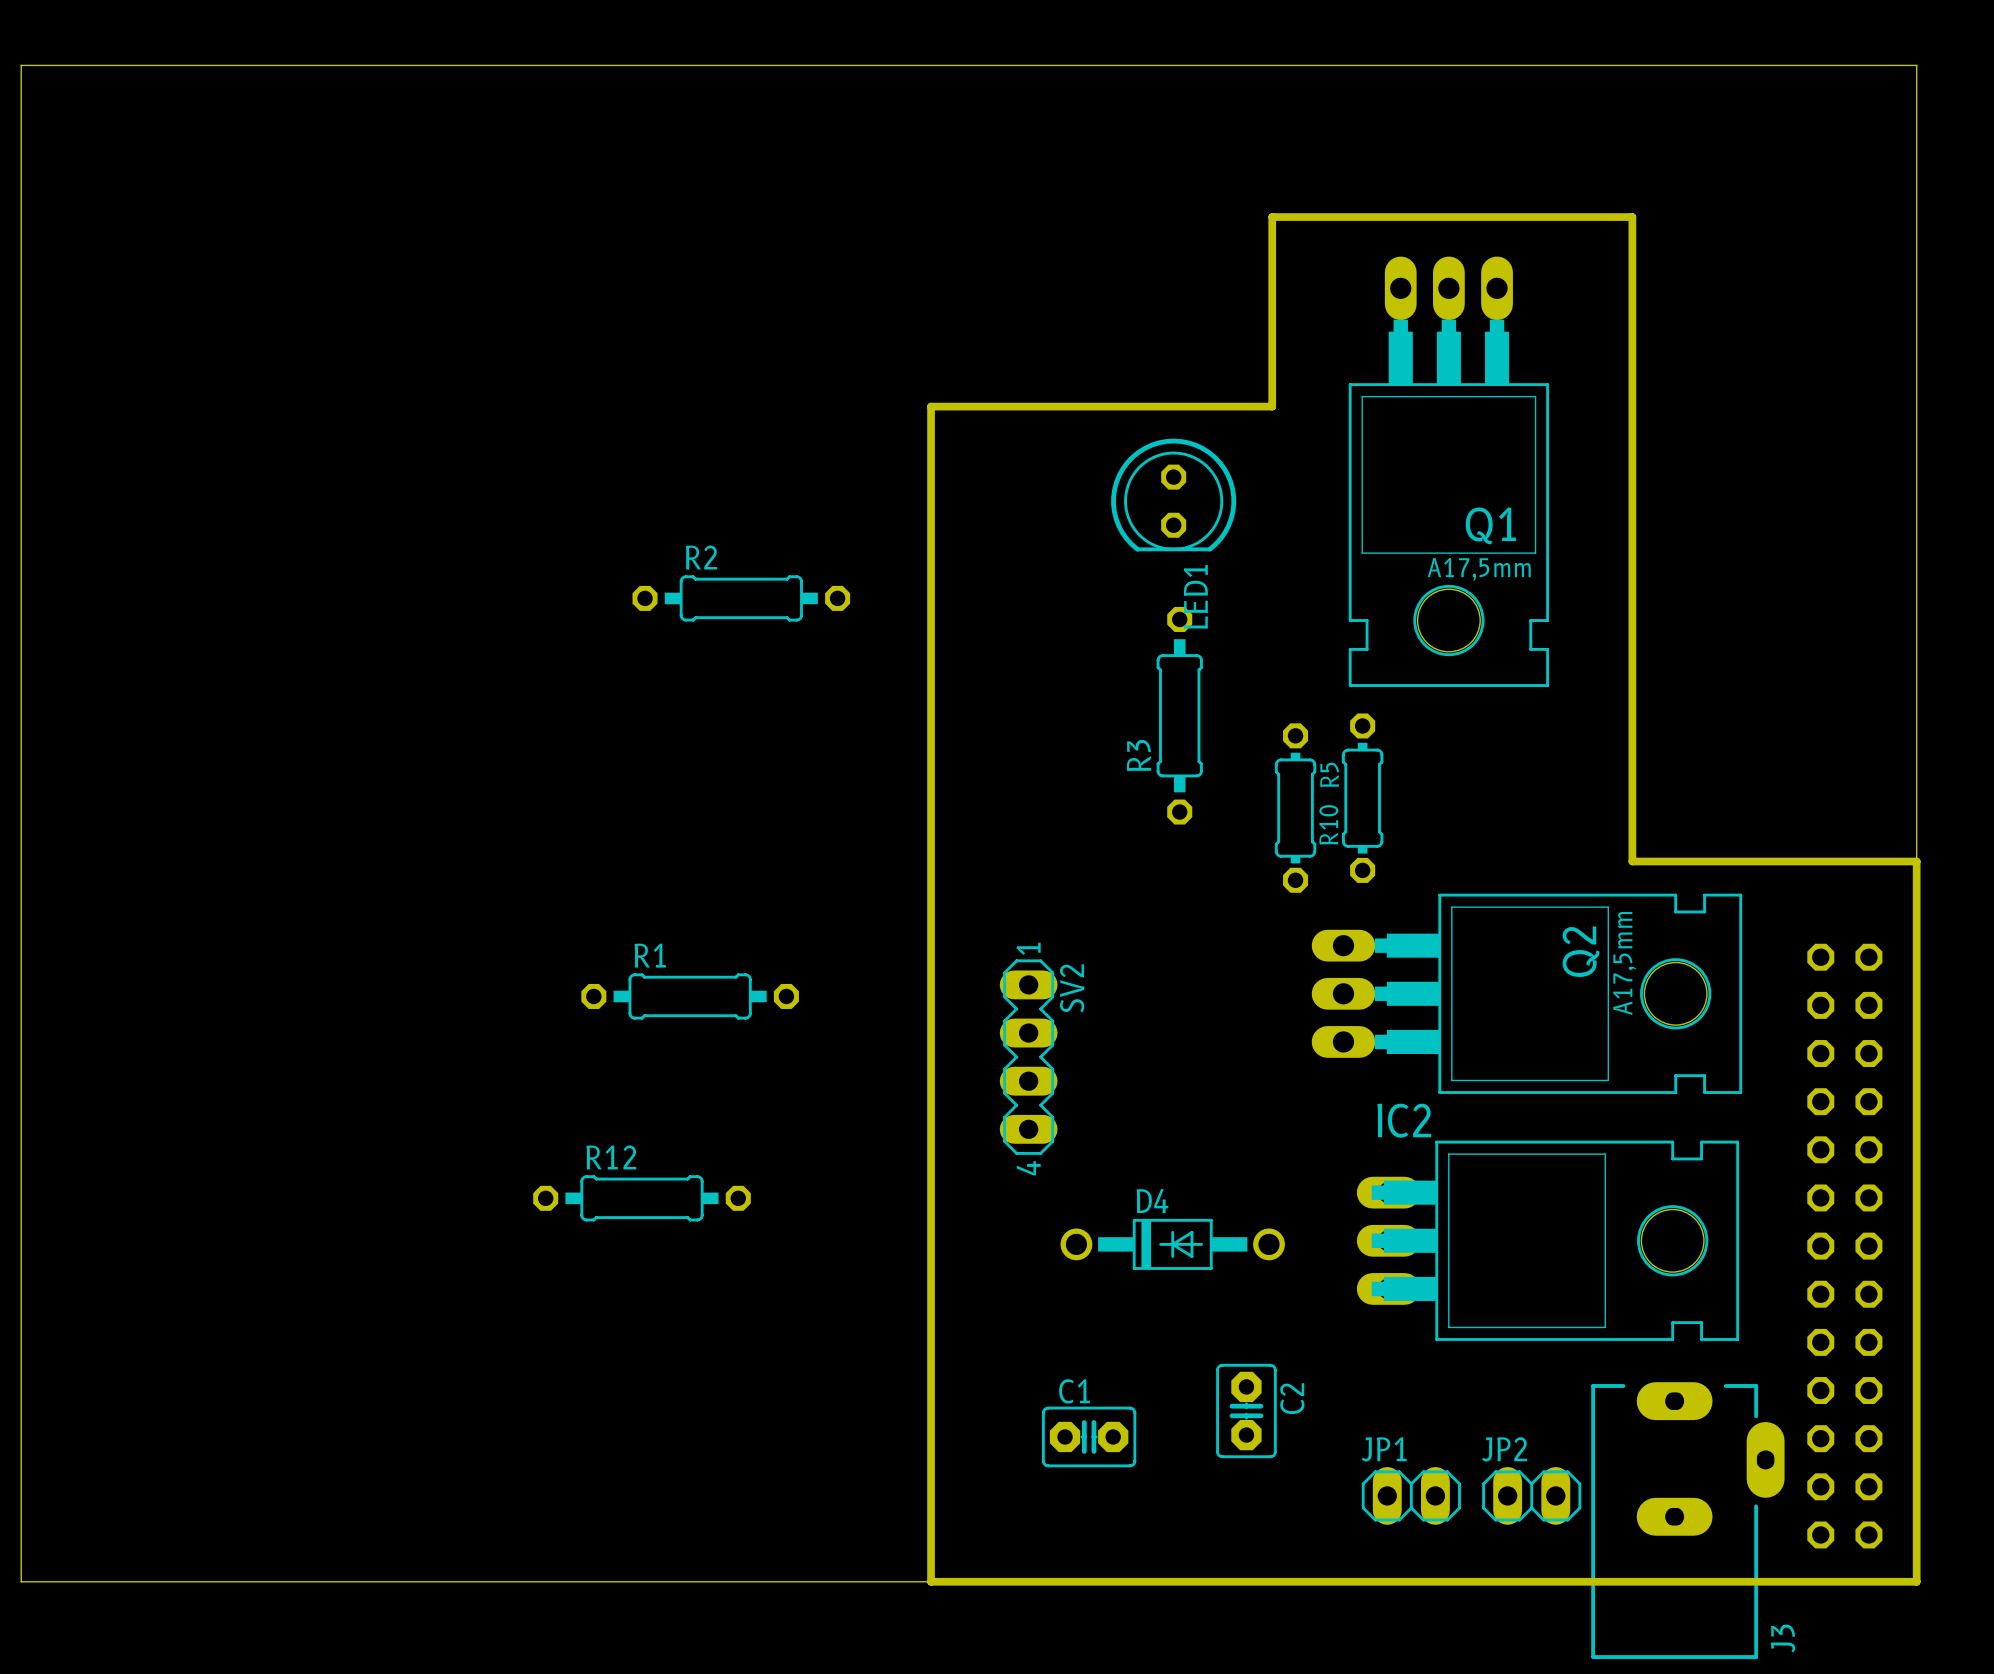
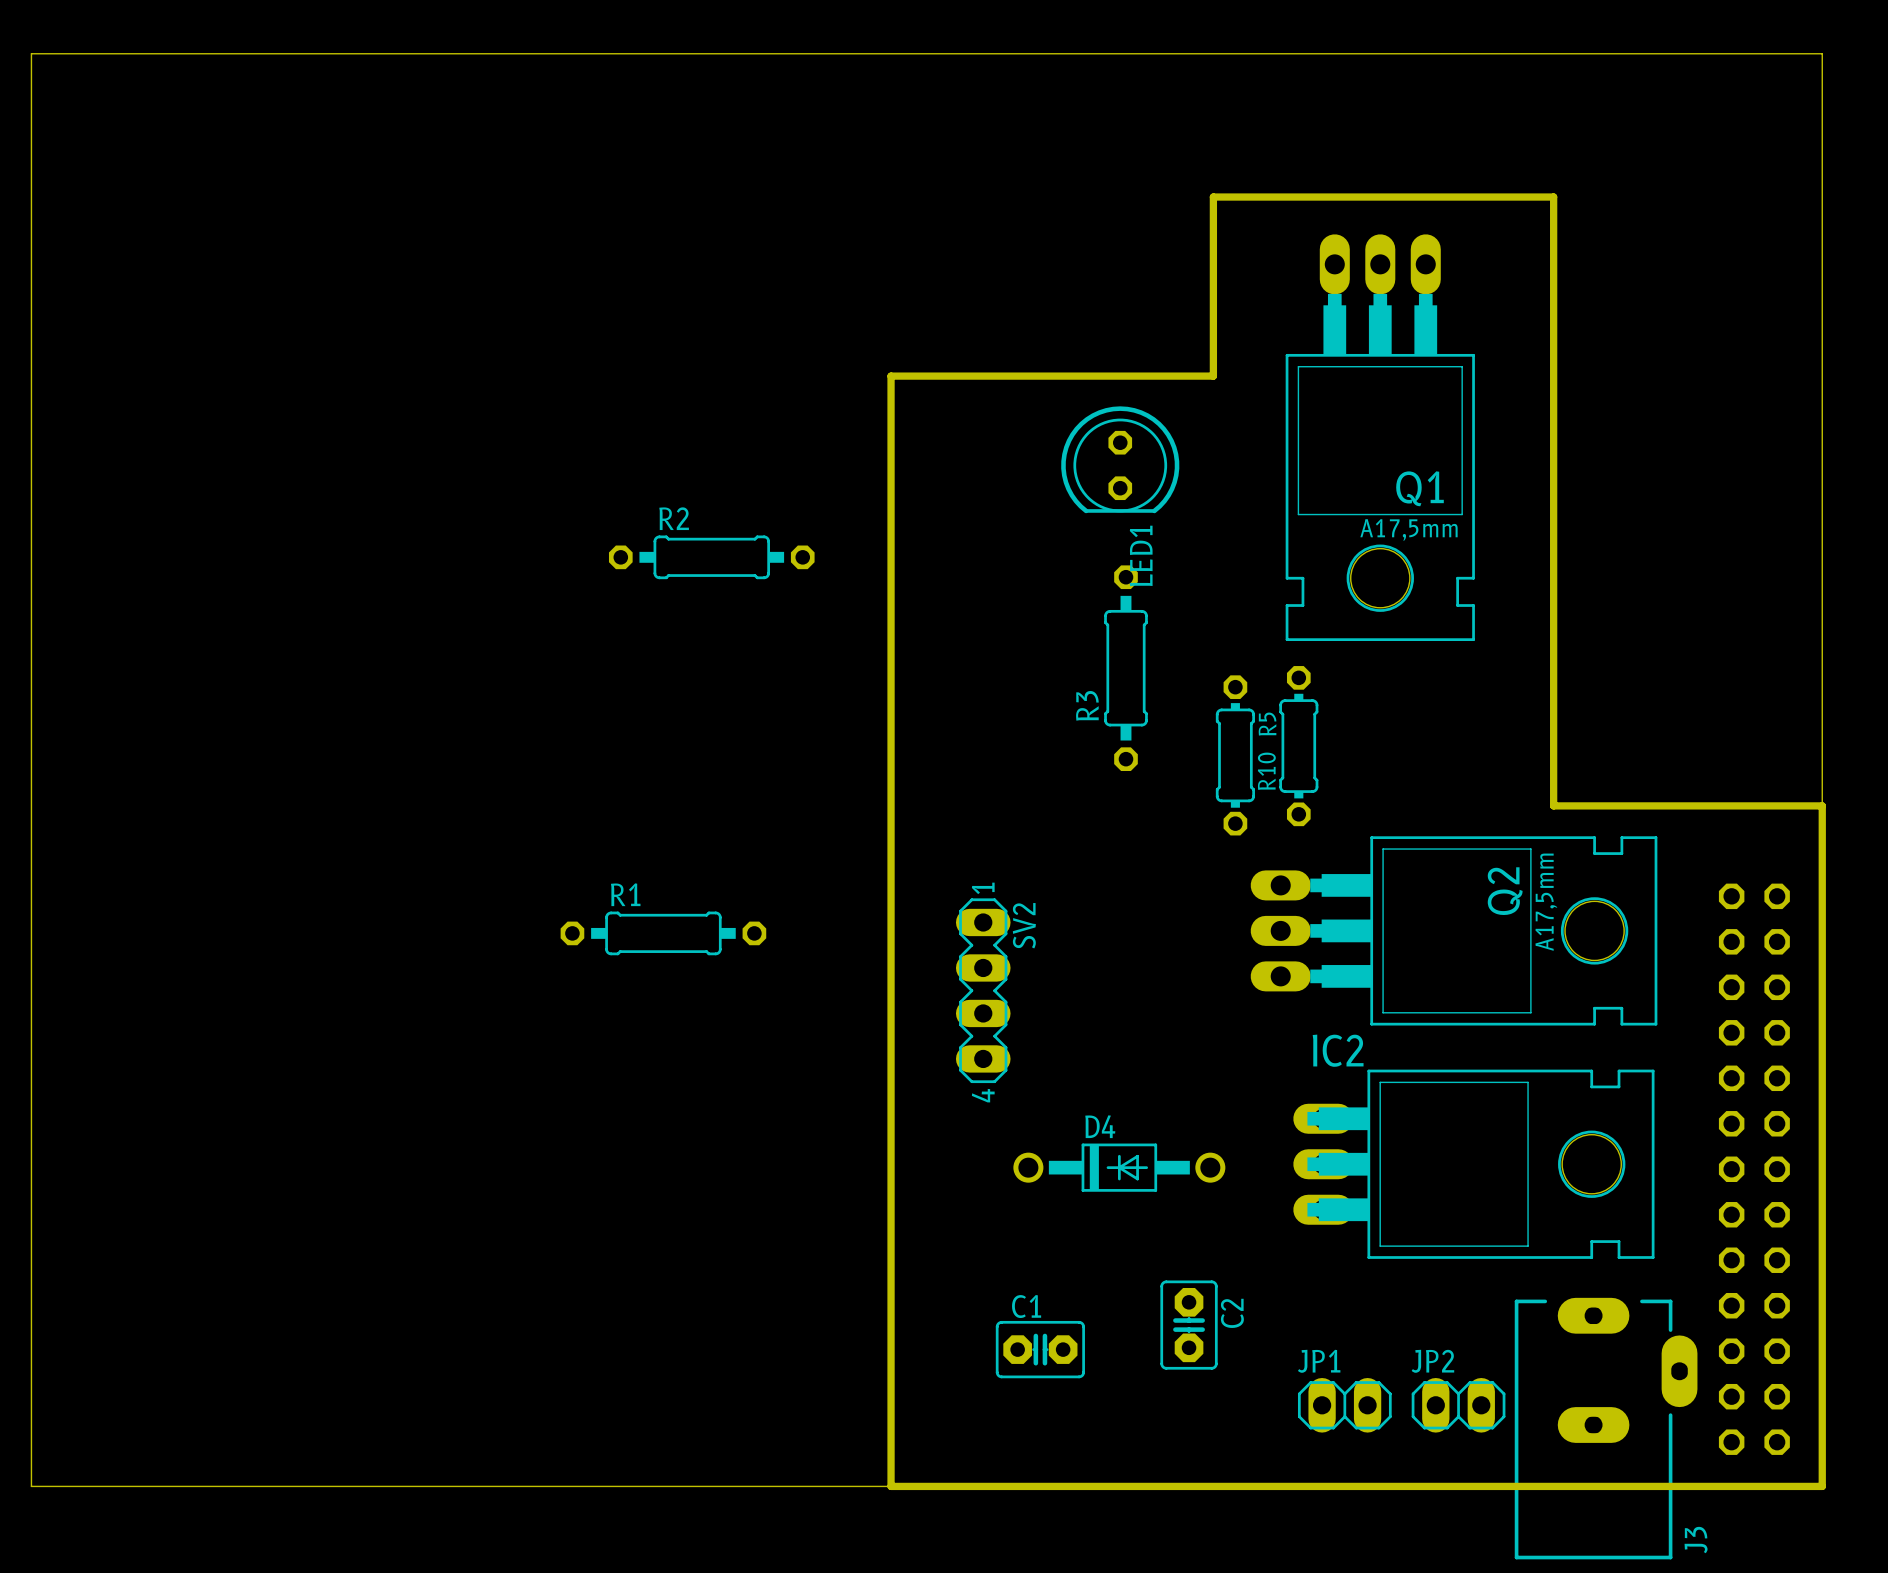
R12: (641, 1198) -> none

